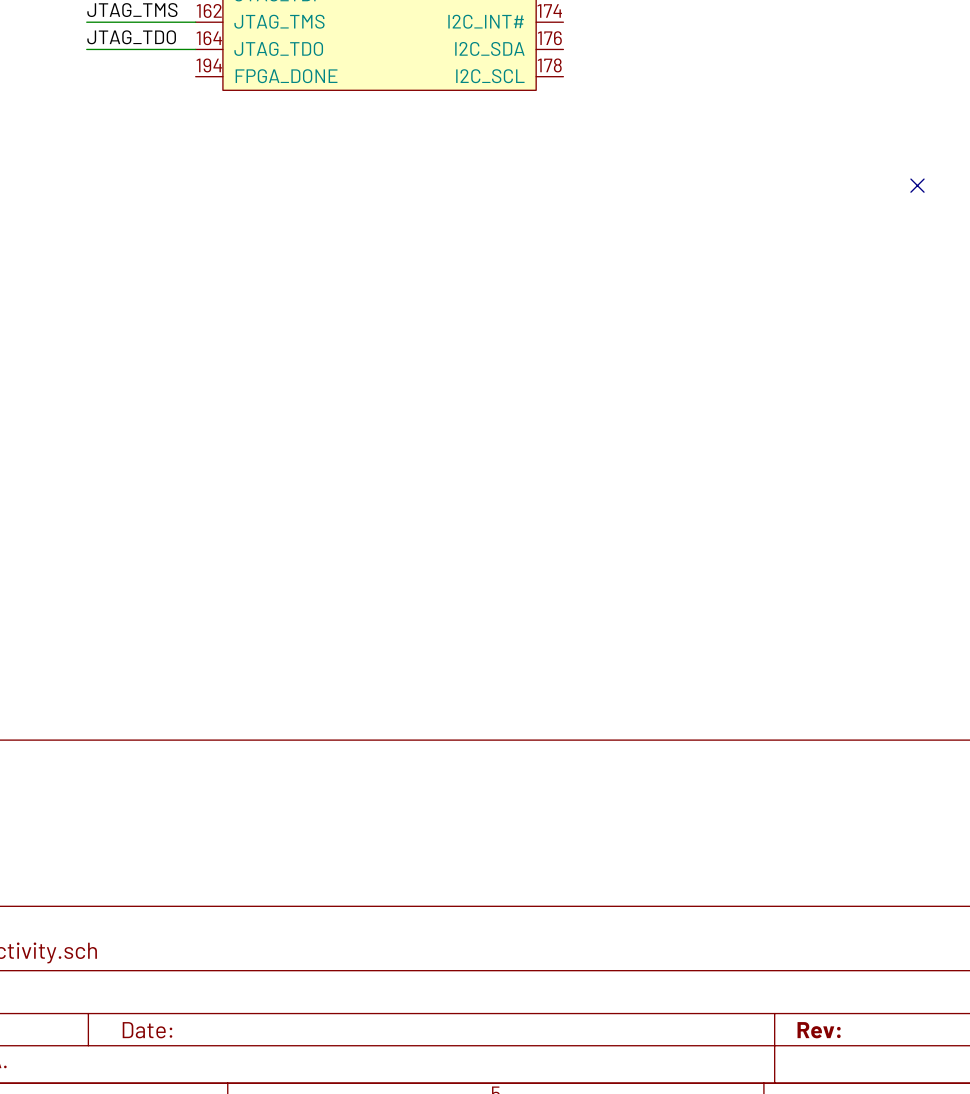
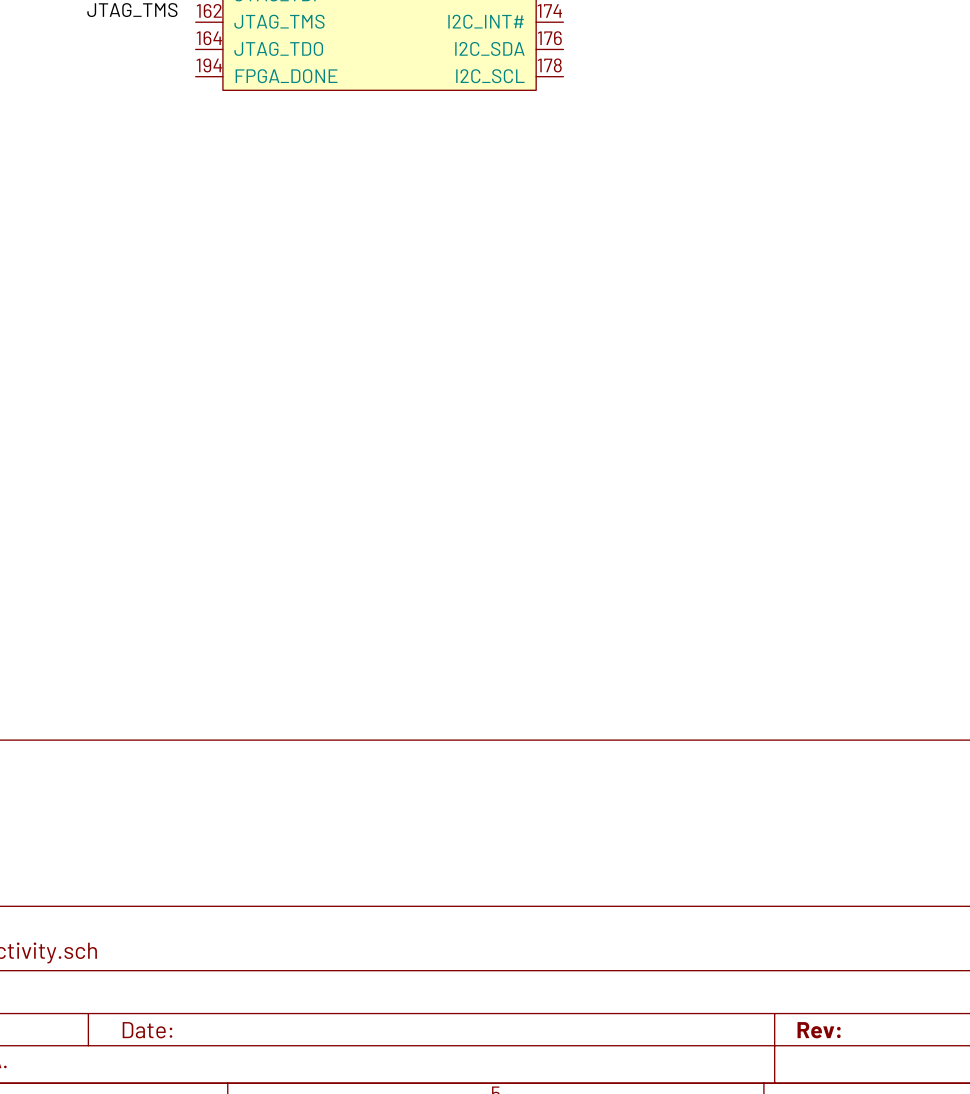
wire: (86, 22) (195, 22) -> none
label: JTAG_TDO (131, 37) -> none
wire: (86, 49) (195, 49) -> none
no-connect mark: (917, 185) -> none

